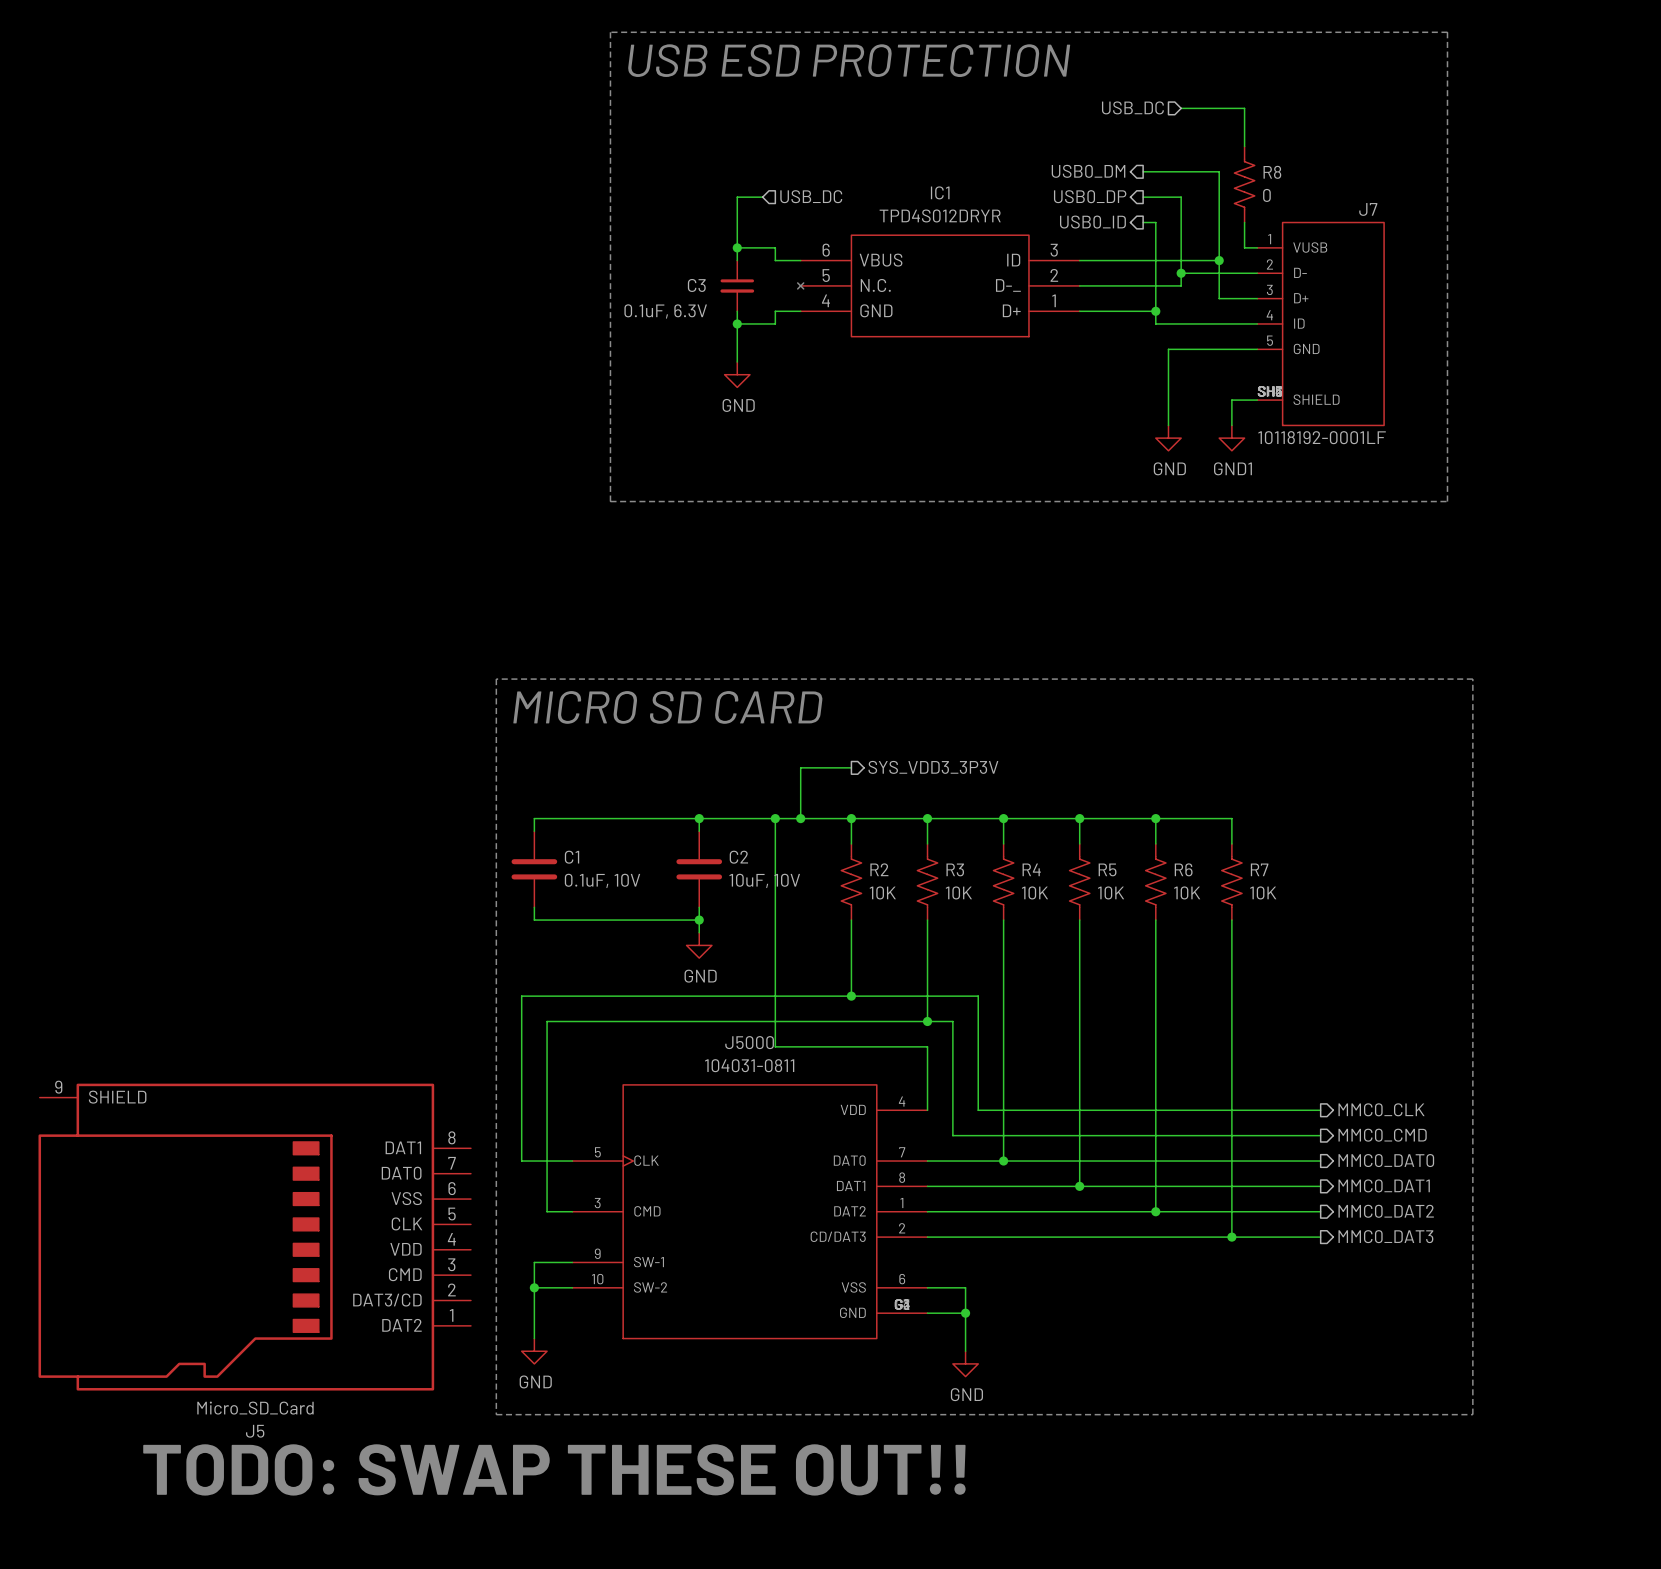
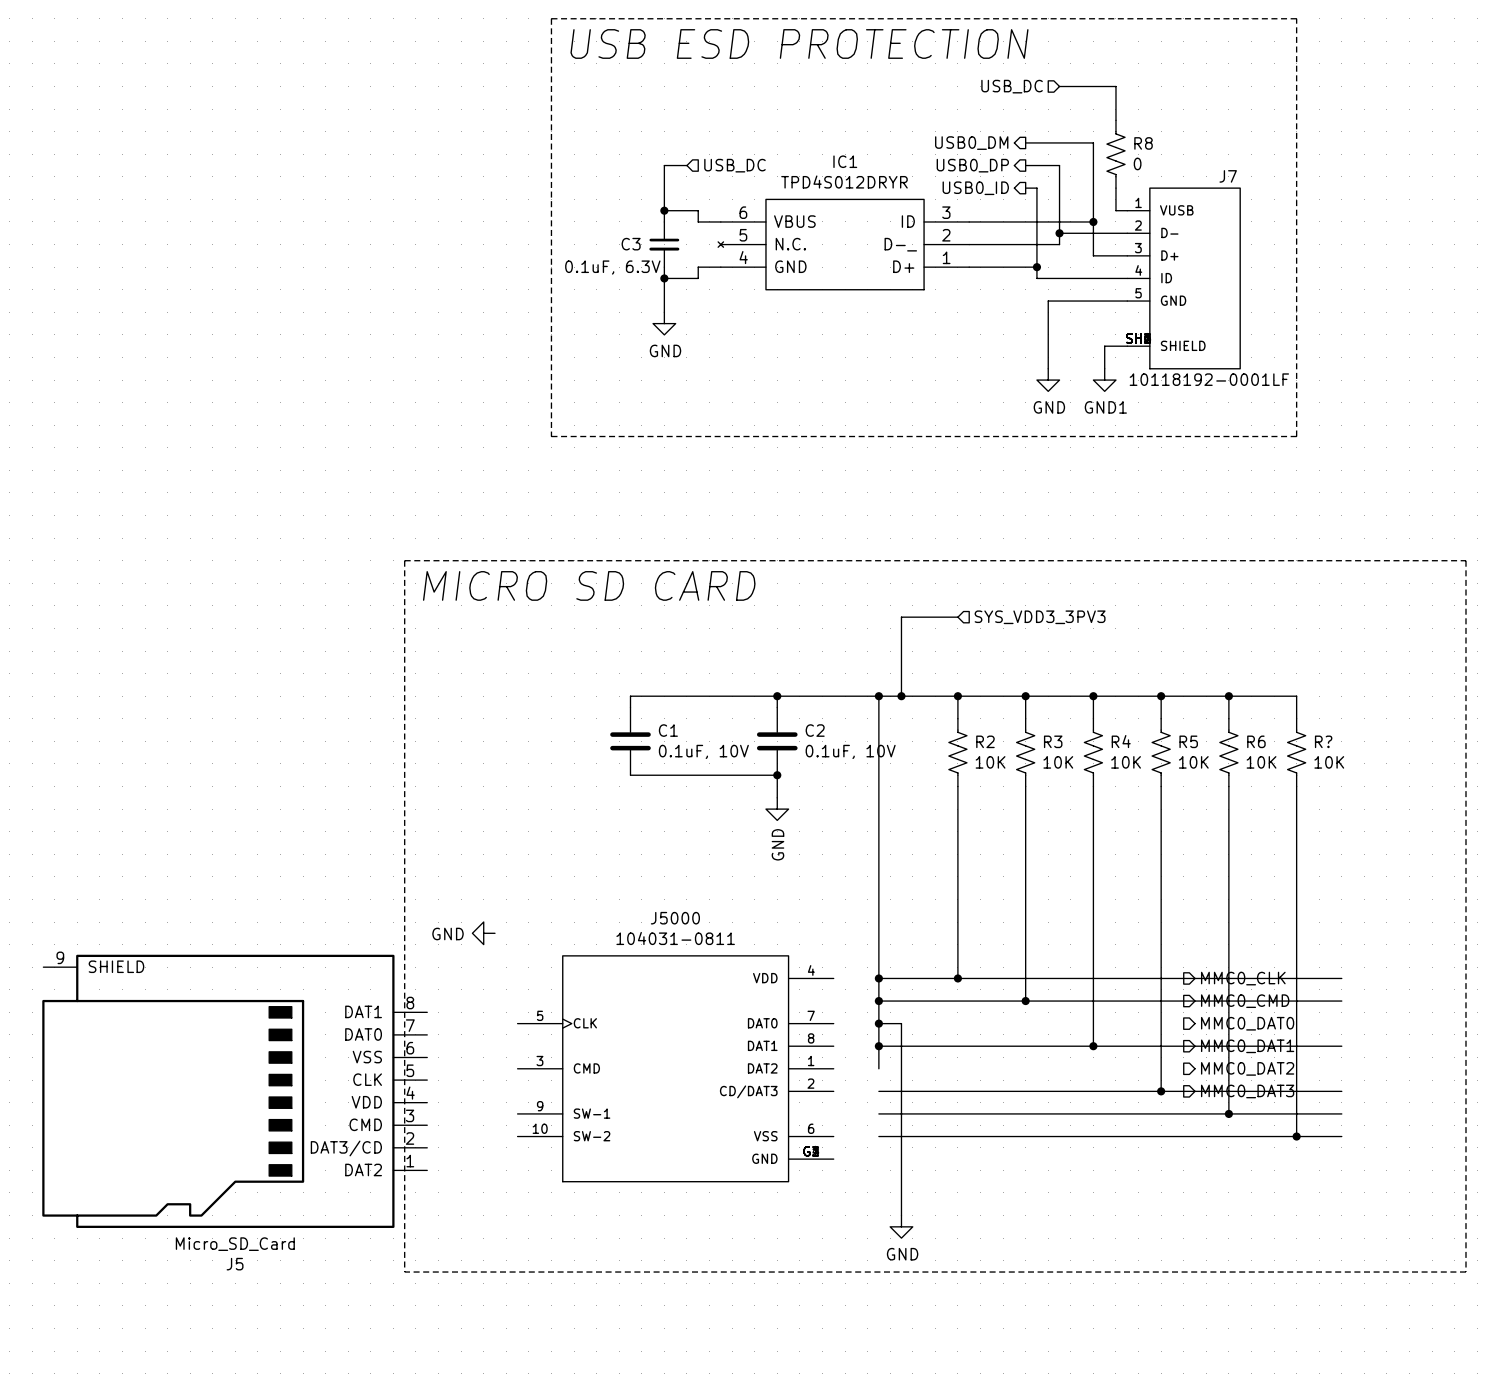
line: (496, 679) (496, 1414) (1472, 1414) (1472, 679) (496, 679) -> (404, 560) (404, 1272) (1466, 1272) (1466, 560) (404, 560)
hierarchical label: none -> SYS_VDD3_3PV3 (1040, 617)
wire: none -> (957, 617) (901, 617) (901, 696)
text position: MICRO SD CARD (668, 707) -> MICRO SD CARD (589, 585)
wire: (851, 767) (800, 767) (800, 818) -> none
hierarchical label: SYS_VDD3_3P3V (933, 767) -> none
junction: none -> (878, 696)
junction: none -> (901, 696)
junction: none -> (1093, 696)
junction: none -> (1161, 696)
junction: none -> (1228, 696)
wire: none -> (630, 707) (630, 696) (1296, 696) (1296, 718)
junction: (699, 818) -> none
wire: (775, 818) (775, 1046) (927, 1046) (927, 1110) -> none
junction: (775, 818) -> none
junction: (800, 818) -> none
wire: (851, 818) (851, 843) -> (957, 696) (957, 718)
junction position: (851, 818) -> (777, 696)
wire: (927, 818) (927, 843) -> (1025, 696) (1025, 718)
junction: (927, 818) -> none
wire: (1003, 818) (1003, 843) -> (1093, 696) (1093, 718)
junction: (1003, 818) -> none
wire: (1079, 818) (1079, 843) -> (1161, 696) (1161, 718)
junction position: (1079, 818) -> (957, 696)
wire: (1155, 818) (1155, 843) -> (1228, 696) (1228, 718)
junction position: (1155, 818) -> (1025, 696)
wire: (534, 831) (534, 818) (1231, 818) (1231, 843) -> none
R?: none -> 10K (1296, 752)
C1 position: (534, 869) -> (630, 741)
C2 position: (699, 869) -> (777, 741)
C2 value: 10uF, 10V (764, 880) -> 0.1uF, 10V (850, 751)
wire: none -> (630, 775) (777, 775) (777, 797)
R2 position: (851, 882) -> (957, 752)
junction: none -> (777, 775)
R3 position: (927, 882) -> (1025, 752)
R4 position: (1003, 882) -> (1093, 752)
R5 position: (1079, 882) -> (1161, 752)
R6 position: (1155, 882) -> (1228, 752)
R7: 10K (1231, 882) -> none
wire: none -> (957, 786) (957, 978)
wire: none -> (1025, 786) (1025, 1001)
wire: none -> (1161, 786) (1161, 1091)
wire: none -> (1228, 786) (1228, 1113)
wire: none -> (1296, 786) (1296, 1136)
wire: (534, 907) (534, 920) (699, 920) -> none
wire: (699, 907) (699, 932) -> none
junction: (699, 920) -> none
wire: (851, 920) (851, 996) -> none
power symbol: none -> GND (777, 809)
wire: (927, 920) (927, 1021) -> (878, 978) (878, 1068)
wire: (1003, 920) (1003, 1161) (1320, 1161) -> none
wire: (1079, 920) (1079, 1186) -> none
wire: (1155, 920) (1155, 1211) -> (1093, 786) (1093, 1046)
wire: (1231, 920) (1231, 1237) -> none
power symbol: GND (699, 945) -> none
junction: (851, 996) -> none
wire: (978, 996) (521, 996) (521, 1161) (572, 1161) -> (878, 876) (878, 696)
junction: (927, 1021) -> none
power symbol: none -> GND (483, 933)
junction: none -> (878, 978)
junction: none -> (957, 978)
wire: none -> (1183, 978) (1341, 978)
wire: (978, 1135) (952, 1135) (952, 1021) (547, 1021) (547, 1211) (572, 1211) -> none
junction: none -> (878, 1001)
junction: none -> (1025, 1001)
wire: none -> (1183, 1001) (1341, 1001)
wire: (927, 1161) (978, 1161) -> none
junction: none -> (878, 1023)
wire: none -> (901, 1023) (901, 1215)
junction: (1003, 1161) -> none
wire: (927, 1186) (978, 1186) -> none
junction: none -> (878, 1046)
junction: (1079, 1186) -> none
junction: none -> (1093, 1046)
wire: none -> (1183, 1046) (1341, 1046)
wire: (927, 1211) (1320, 1211) -> none
junction: (1155, 1211) -> none
wire: (927, 1237) (978, 1237) -> none
junction: (1231, 1237) -> none
junction: none -> (1161, 1091)
wire: none -> (1183, 1091) (1341, 1091)
wire: (572, 1262) (534, 1262) (534, 1338) -> none
wire: none -> (878, 1113) (1341, 1113)
junction: none -> (1228, 1113)
wire: (534, 1287) (572, 1287) -> none
junction: (534, 1287) -> none
wire: (927, 1287) (965, 1287) (965, 1351) -> none
wire: none -> (878, 1136) (1341, 1136)
junction: none -> (1296, 1136)
wire: (927, 1313) (965, 1313) -> none
junction: (965, 1313) -> none
power symbol: GND (534, 1351) -> none
power symbol position: GND (965, 1363) -> GND (901, 1226)
text: TODO: SWAP THESE OUT!! (554, 1469) -> none

